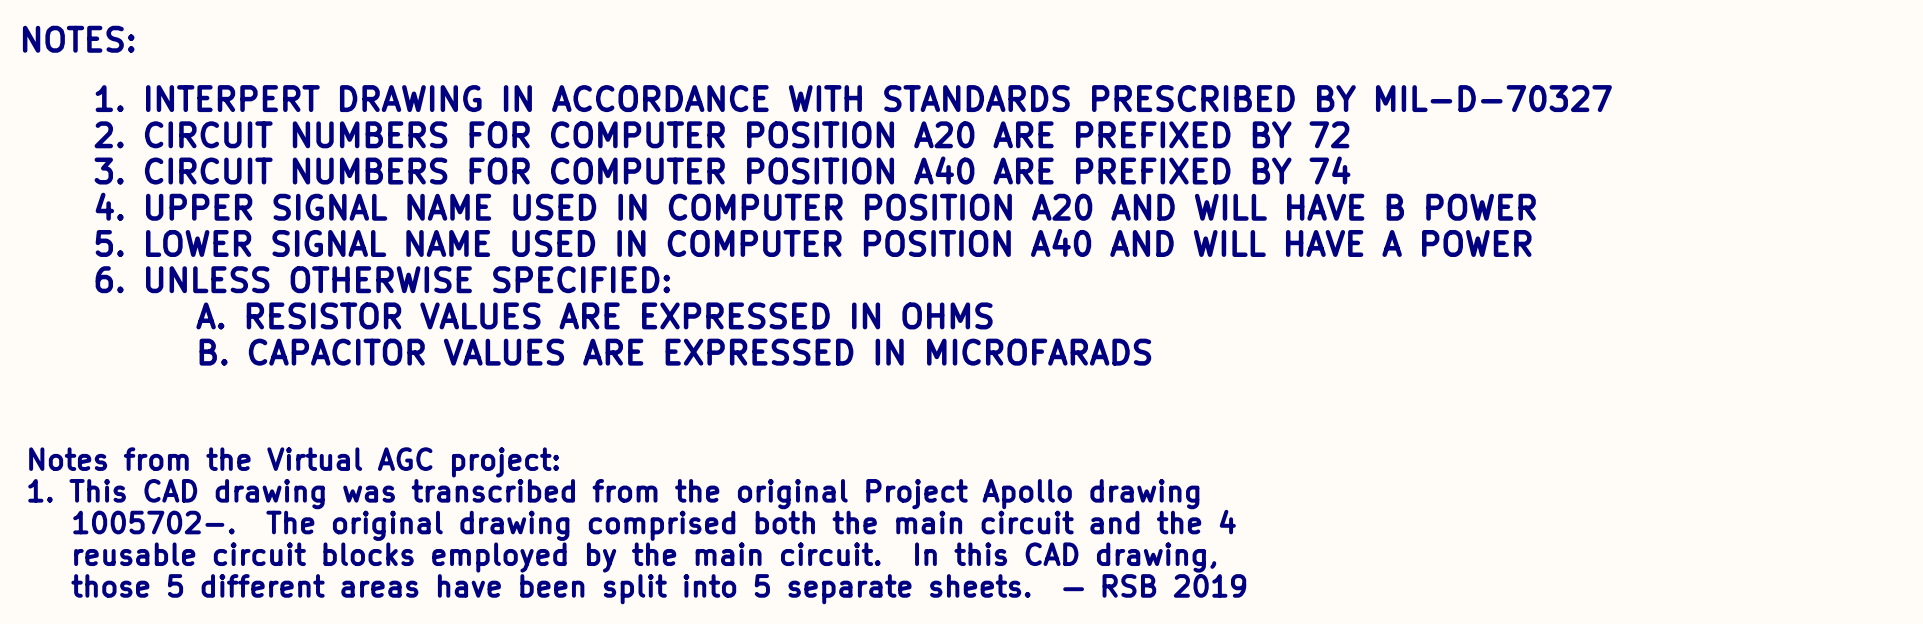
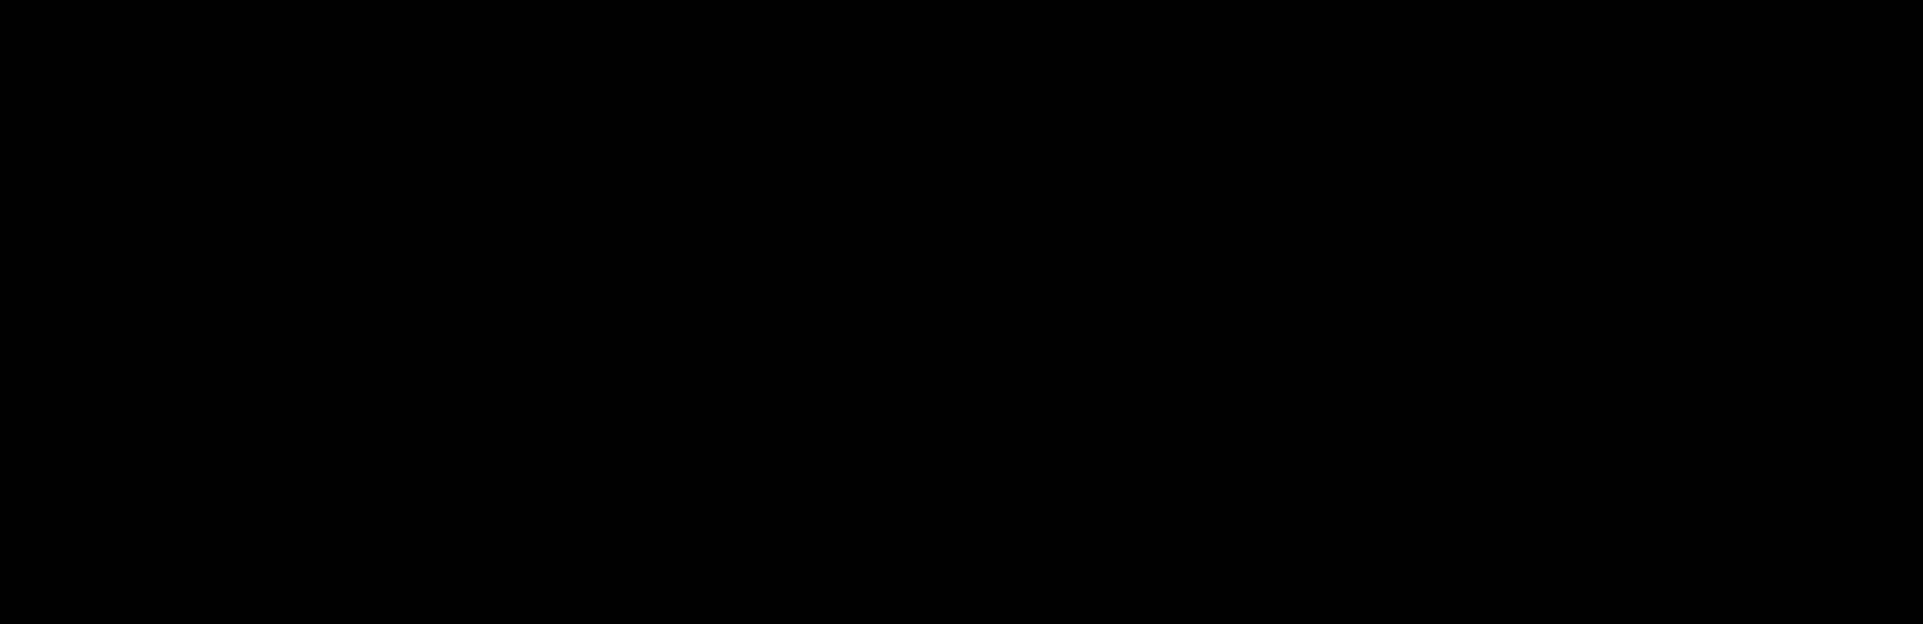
text: NOTES: (78, 39) -> none
text: 1. INTERPERT DRAWING IN ACCORDANCE WITH STANDARDS PRESCRIBED BY MIL-D-70327 (853, 98) -> none
text: 2. CIRCUIT NUMBERS FOR COMPUTER POSITION A20 ARE PREFIXED BY 72 (721, 134) -> none
text: 3. CIRCUIT NUMBERS FOR COMPUTER POSITION A40 ARE PREFIXED BY 74 (722, 170) -> none
text: 4. UPPER SIGNAL NAME USED IN COMPUTER POSITION A20 AND WILL HAVE B POWER (815, 206) -> none
text: 5. LOWER SIGNAL NAME USED IN COMPUTER POSITION A40 AND WILL HAVE A POWER (813, 242) -> none
text: 6. UNLESS OTHERWISE SPECIFIED: (382, 279) -> none
text: A. RESISTOR VALUES ARE EXPRESSED IN OHMS (594, 315) -> none
text: B. CAPACITOR VALUES ARE EXPRESSED IN MICROFARADS (675, 352) -> none
text: Notes from the Virtual AGC project: (294, 462) -> none
text: 1. This CAD drawing was transcribed from the original Project Apollo drawing (613, 494) -> none
text: 1005702-. The original drawing comprised both the main circuit and the 4 (654, 525) -> none
text: reusable circuit blocks employed by the main circuit. In this CAD drawing, (645, 557) -> none
text: those 5 different areas have been split into 5 separate sheets. — RSB 2019 (658, 589) -> none

